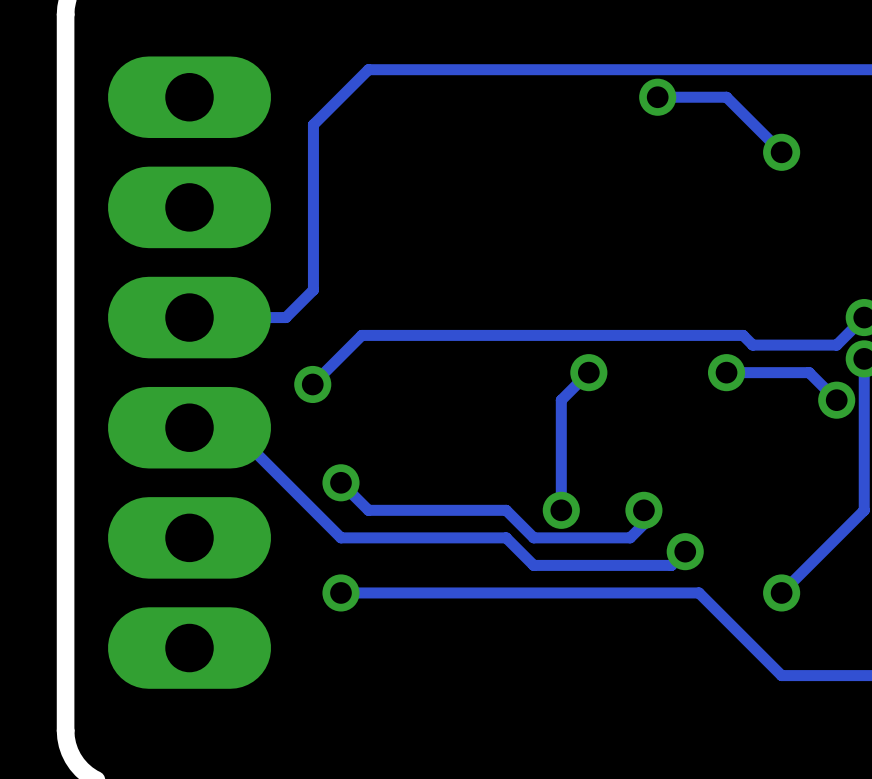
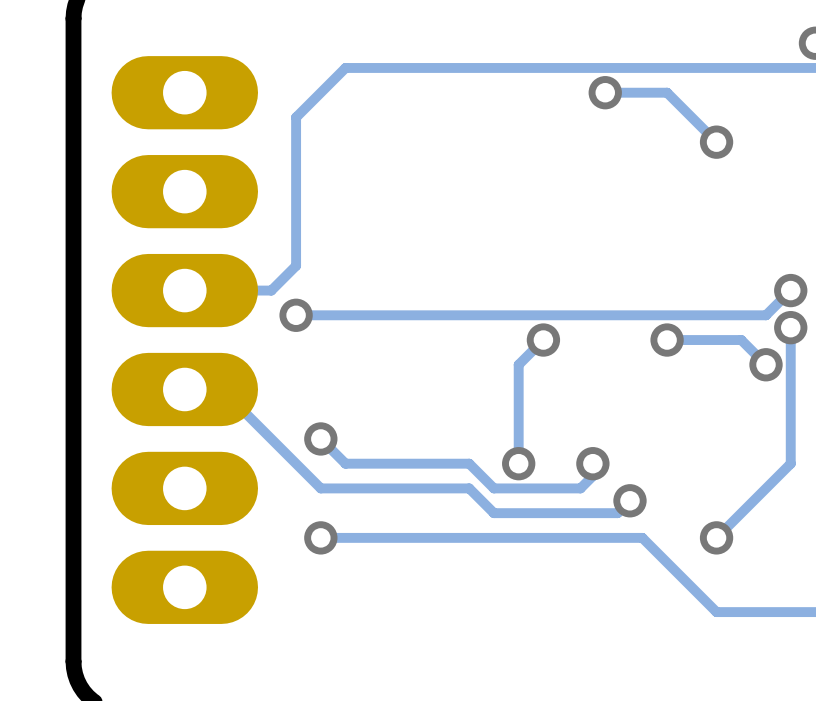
track: (752, 345) (743, 335) (361, 335) (312, 384) -> (690, 315) (296, 315)
via position: (312, 384) -> (296, 315)

